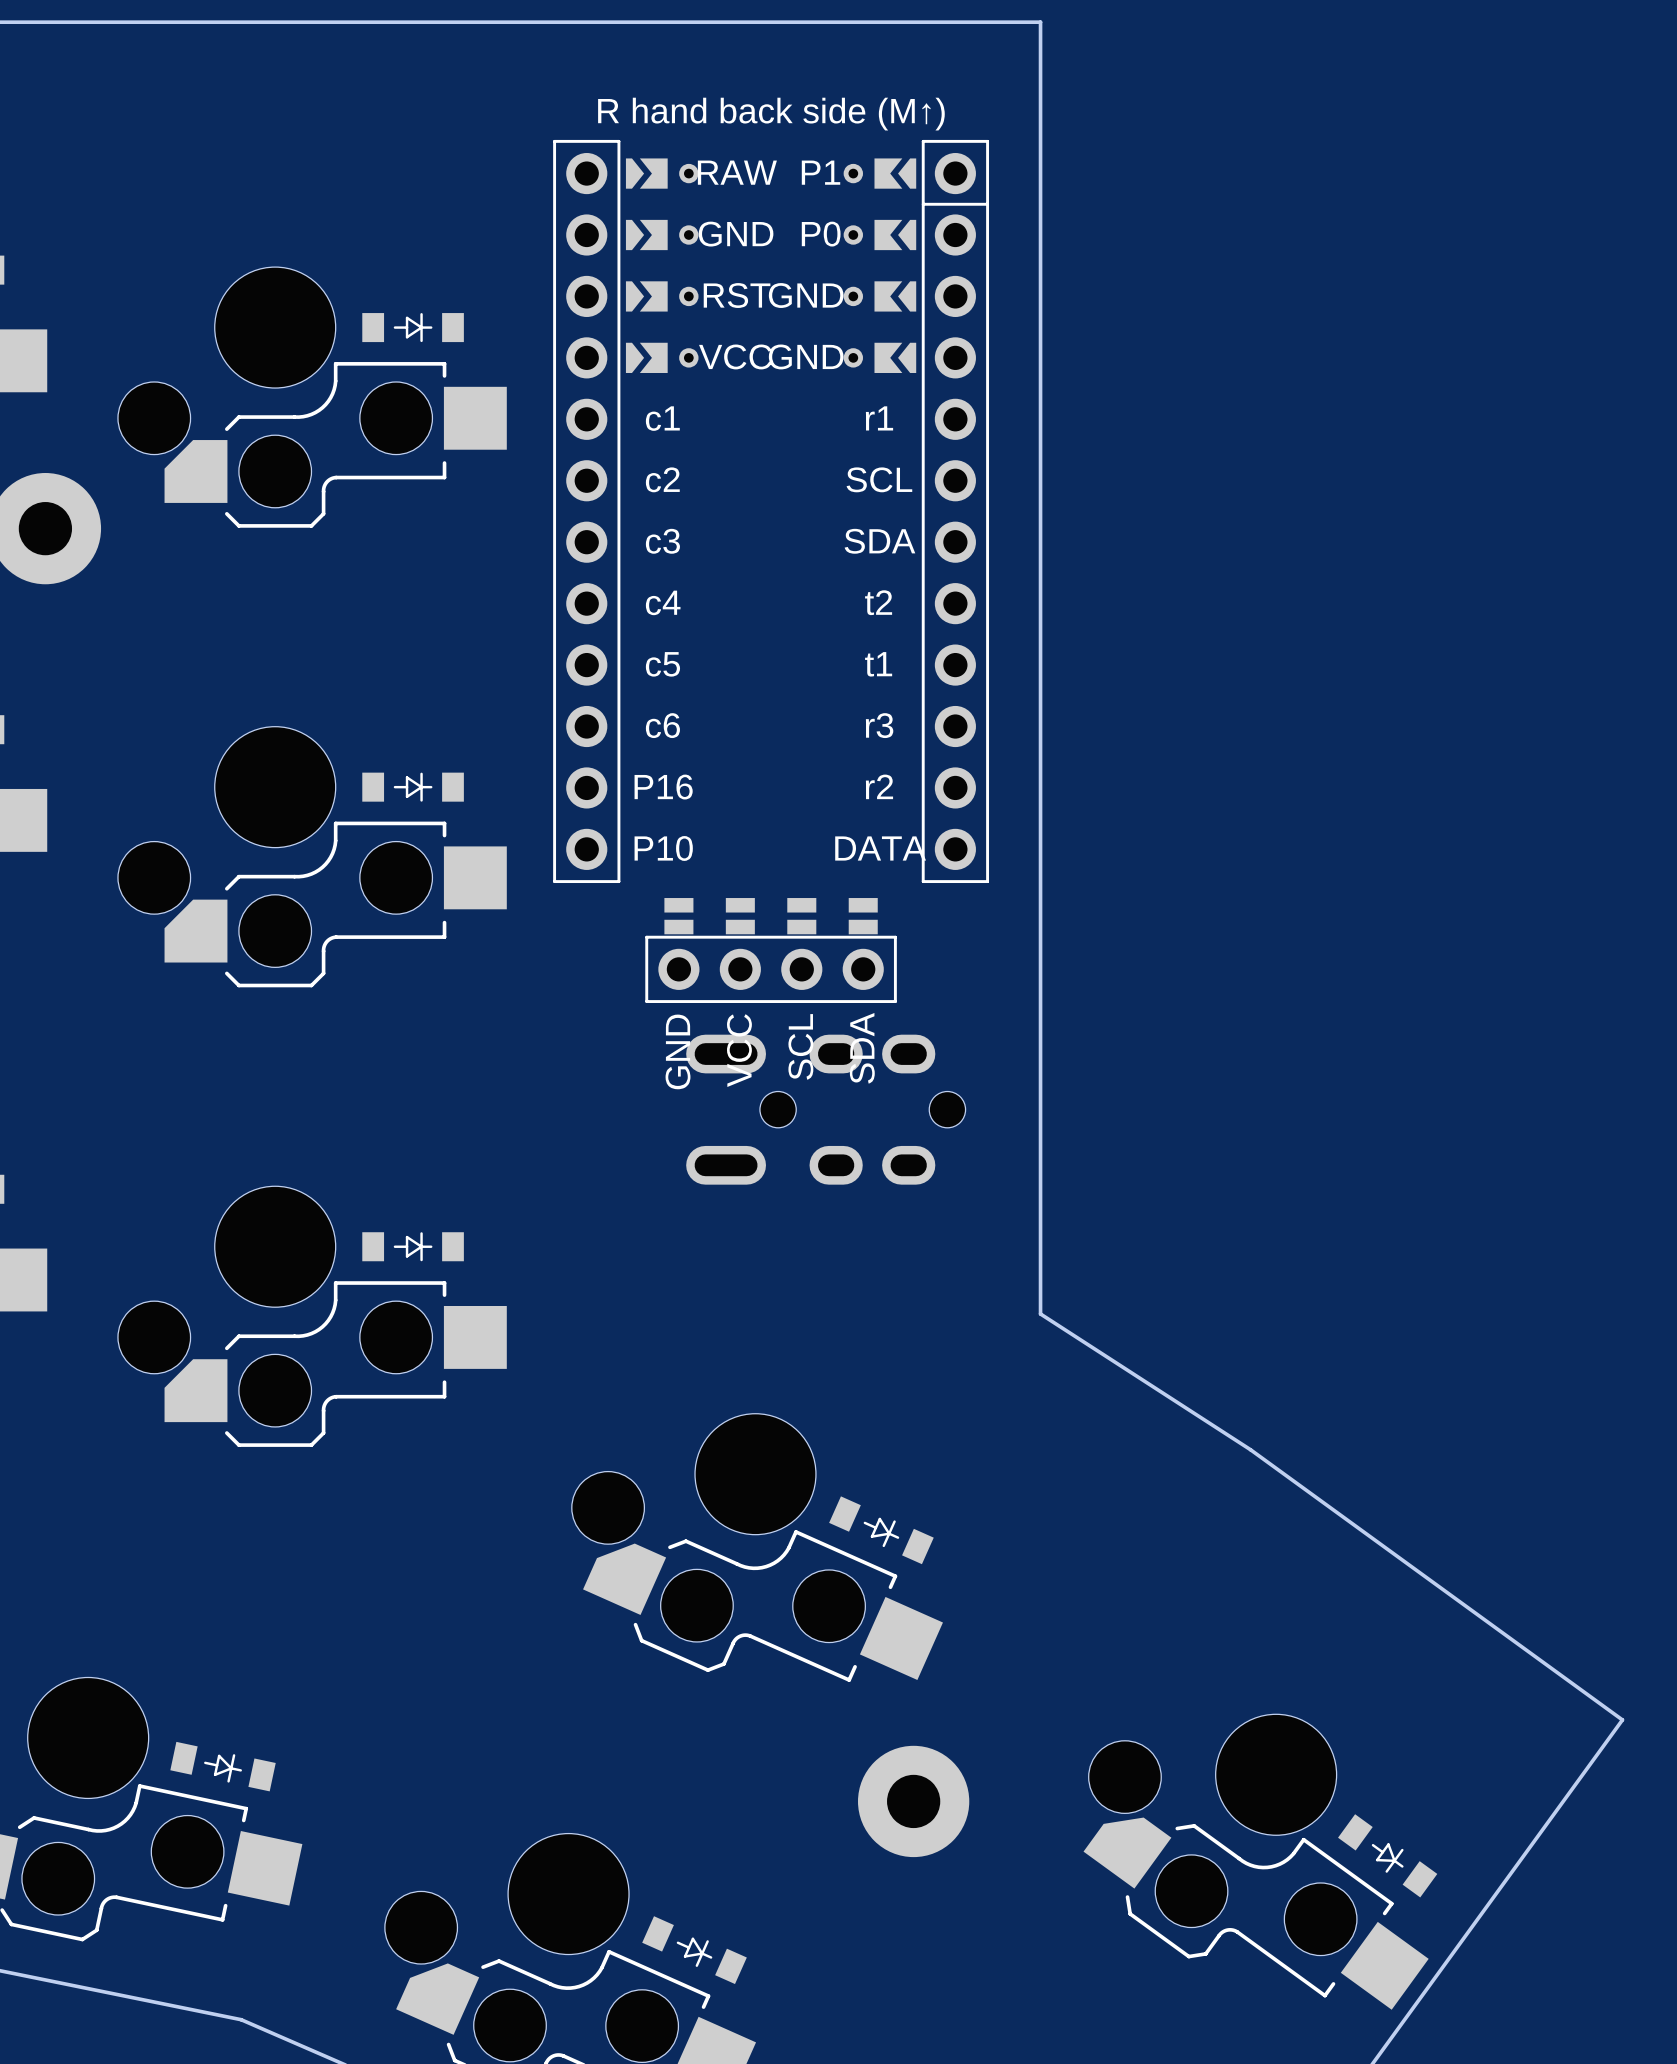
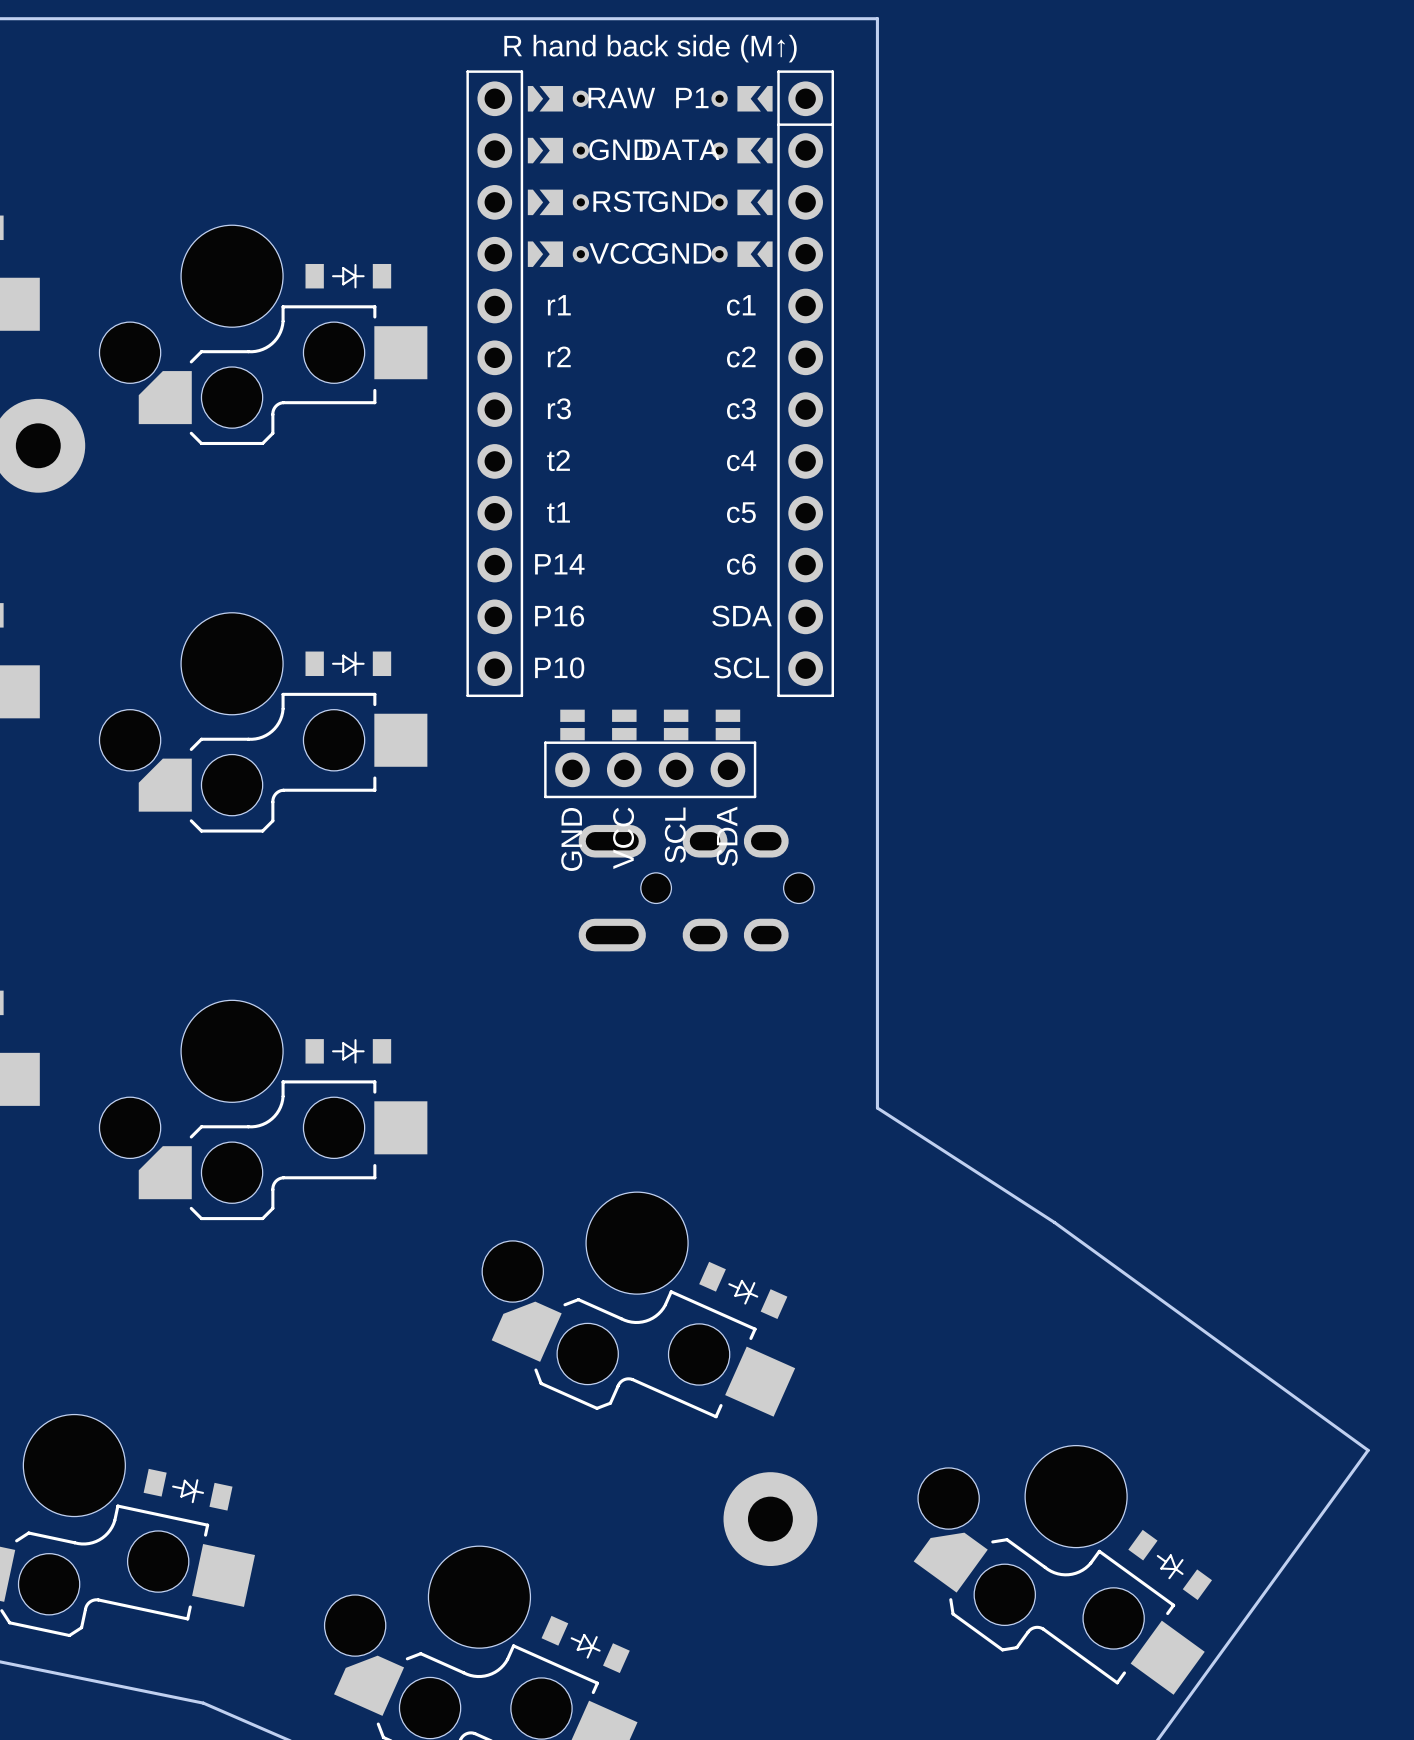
part: none -> (650, 383)
part: (771, 511) -> none
part position: (771, 950) -> (650, 753)
part position: (825, 1109) -> (696, 888)

